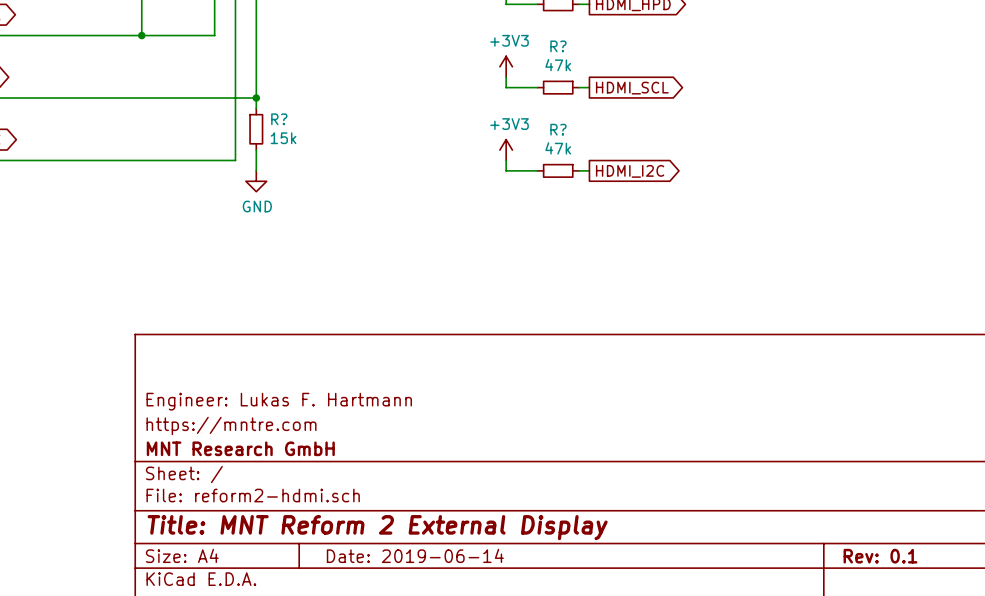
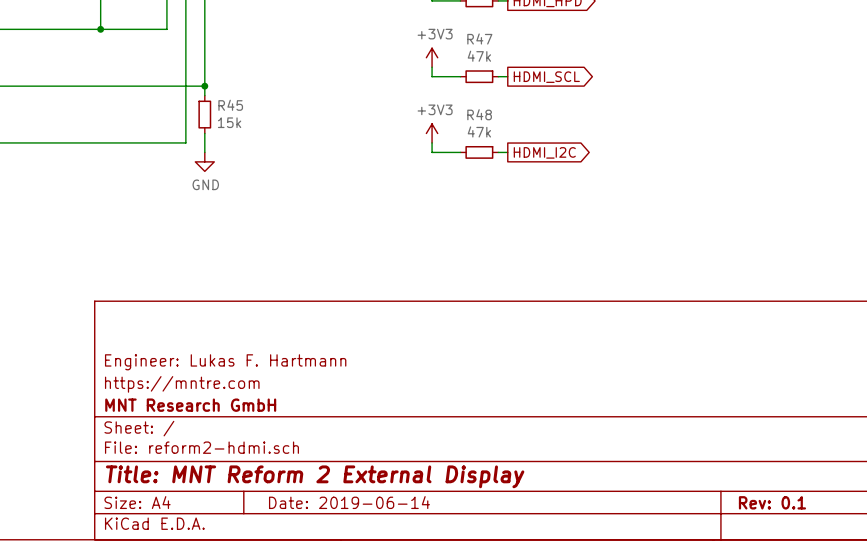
R? name: R? (558, 46) -> R47 (479, 38)
R? name: R? (279, 119) -> R45 (230, 105)
R? name: R? (558, 129) -> R48 (479, 114)

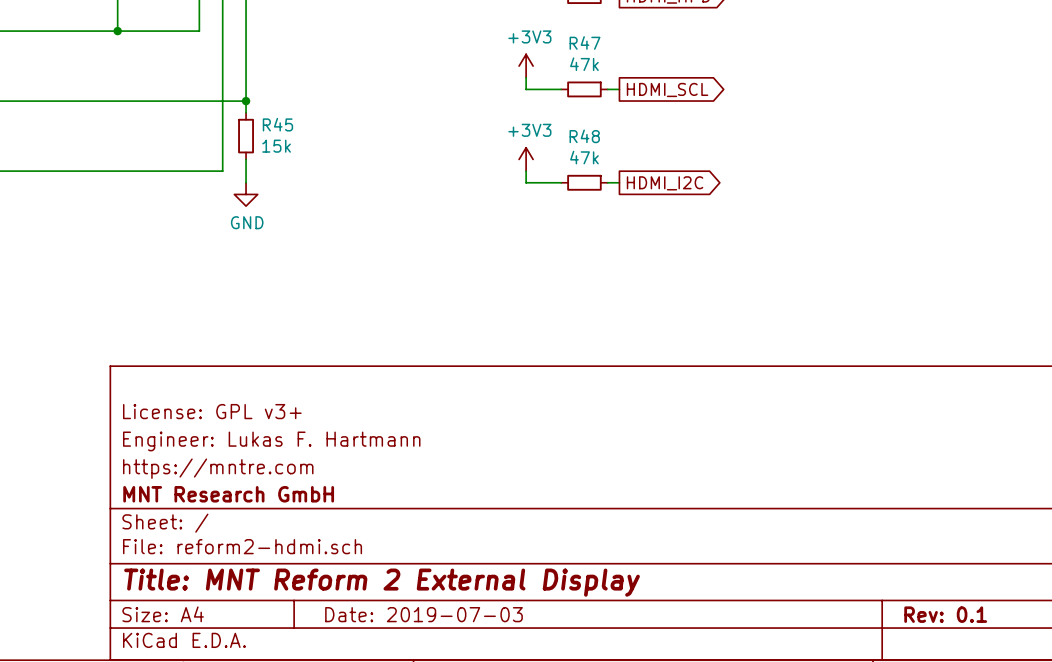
title block: none -> License: GPL v3+ (212, 411)
title block: Date: 2019-06-14 (349, 502) -> Date: 2019-07-03 (424, 614)

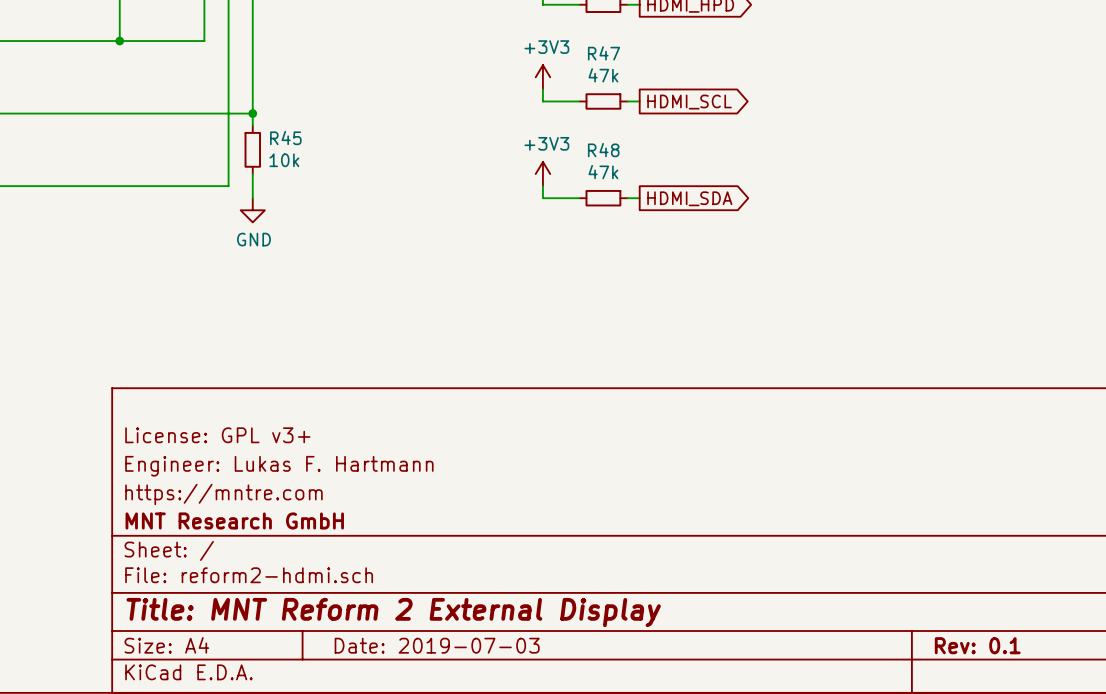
R45 value: 15k (276, 146) -> 10k (284, 160)
global label: HDMI_I2C (665, 183) -> HDMI_SDA (689, 198)

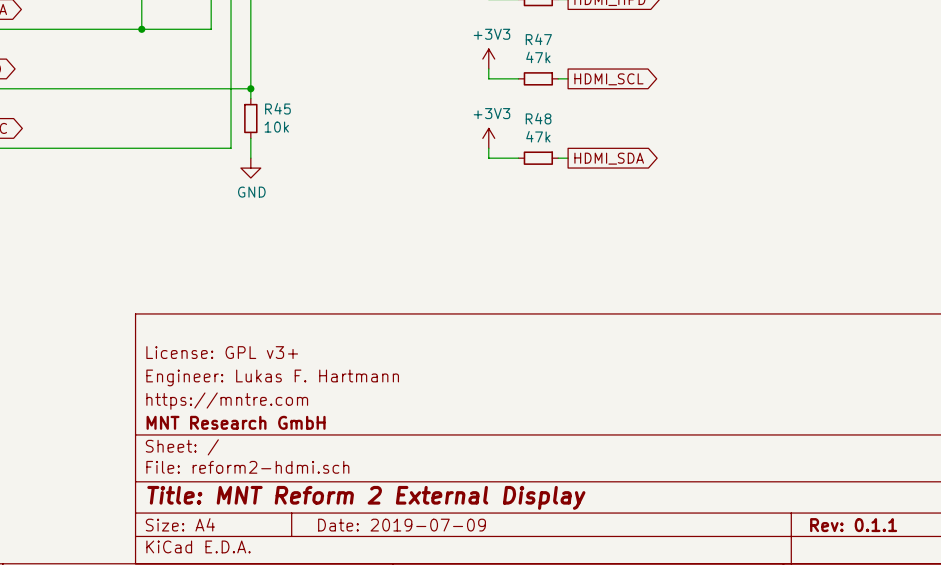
title block: Date: 2019-07-03 (437, 645) -> Date: 2019-07-09 (402, 525)
title block: Rev: 0.1 (977, 645) -> Rev: 0.1.1 (853, 525)

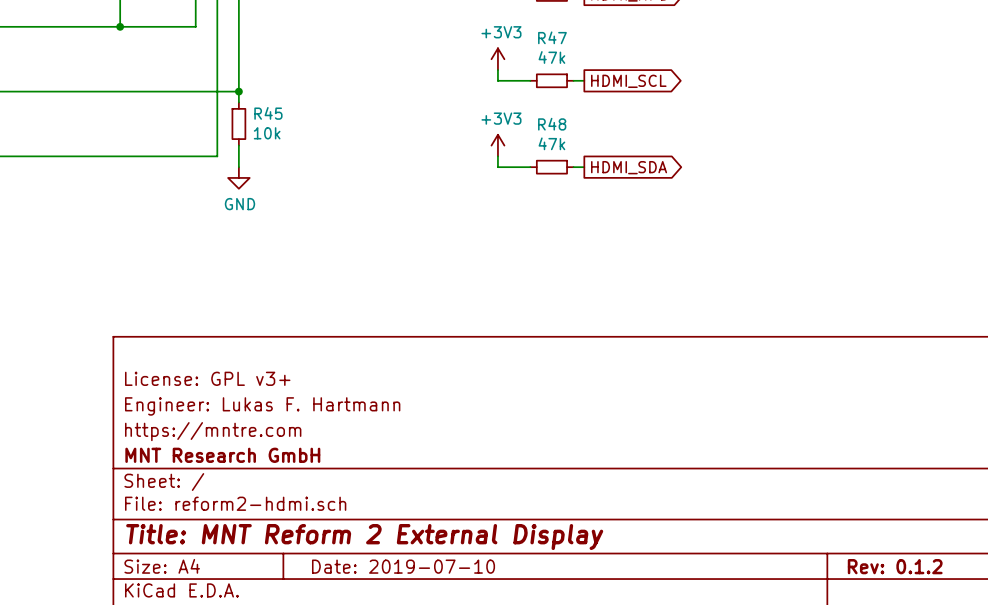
title block: Date: 2019-07-09 (402, 525) -> Date: 2019-07-10 (403, 566)
title block: Rev: 0.1.1 (853, 525) -> Rev: 0.1.2 (895, 566)

